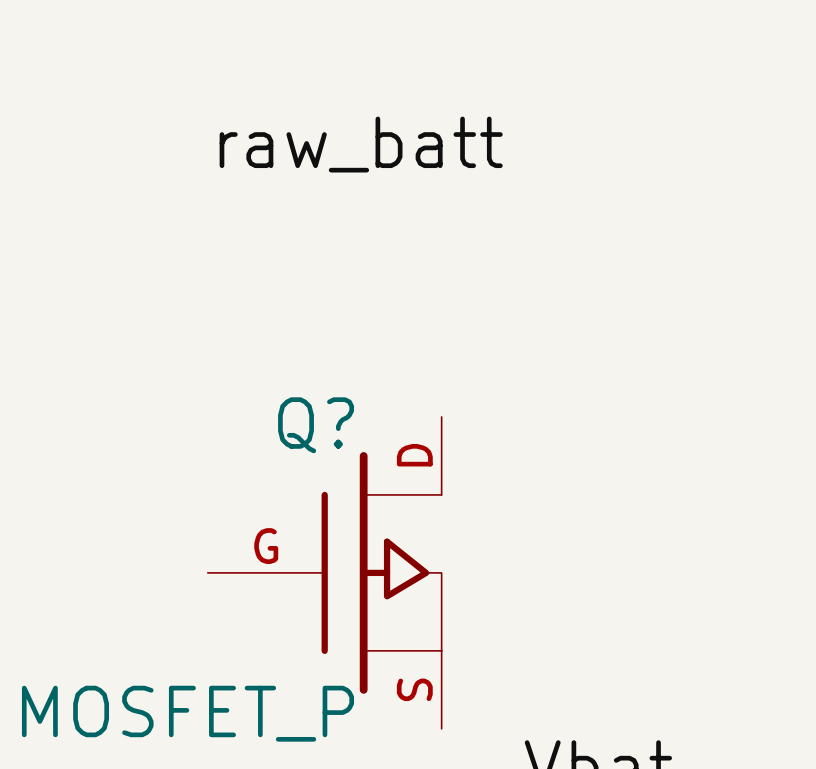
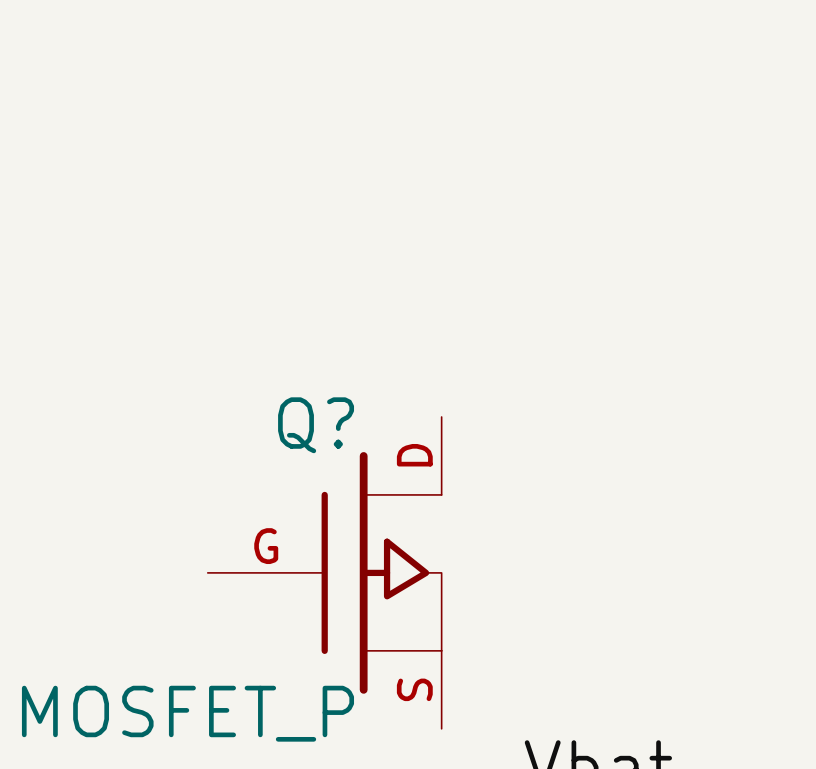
label: raw_batt (361, 144) -> none

